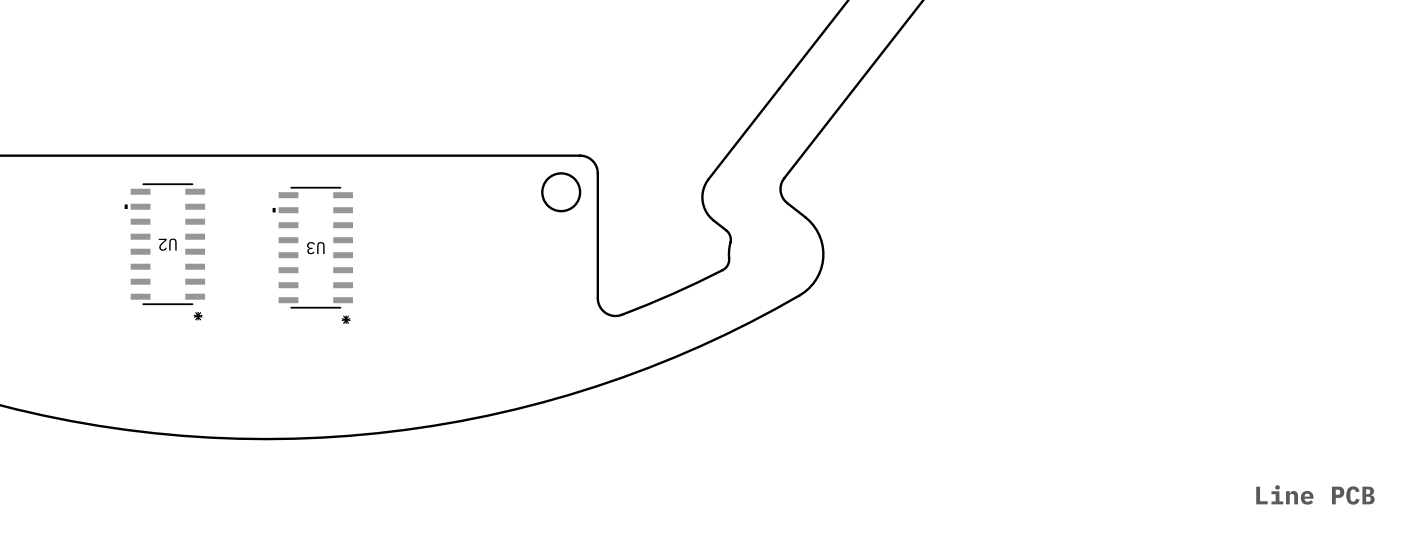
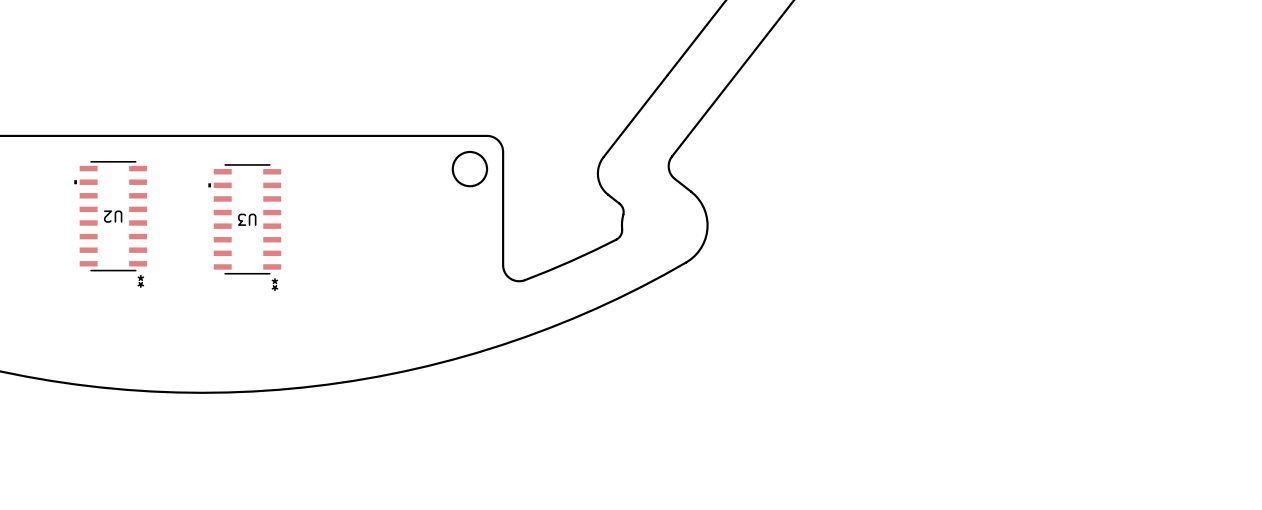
text: Line PCB (1315, 494) -> none

